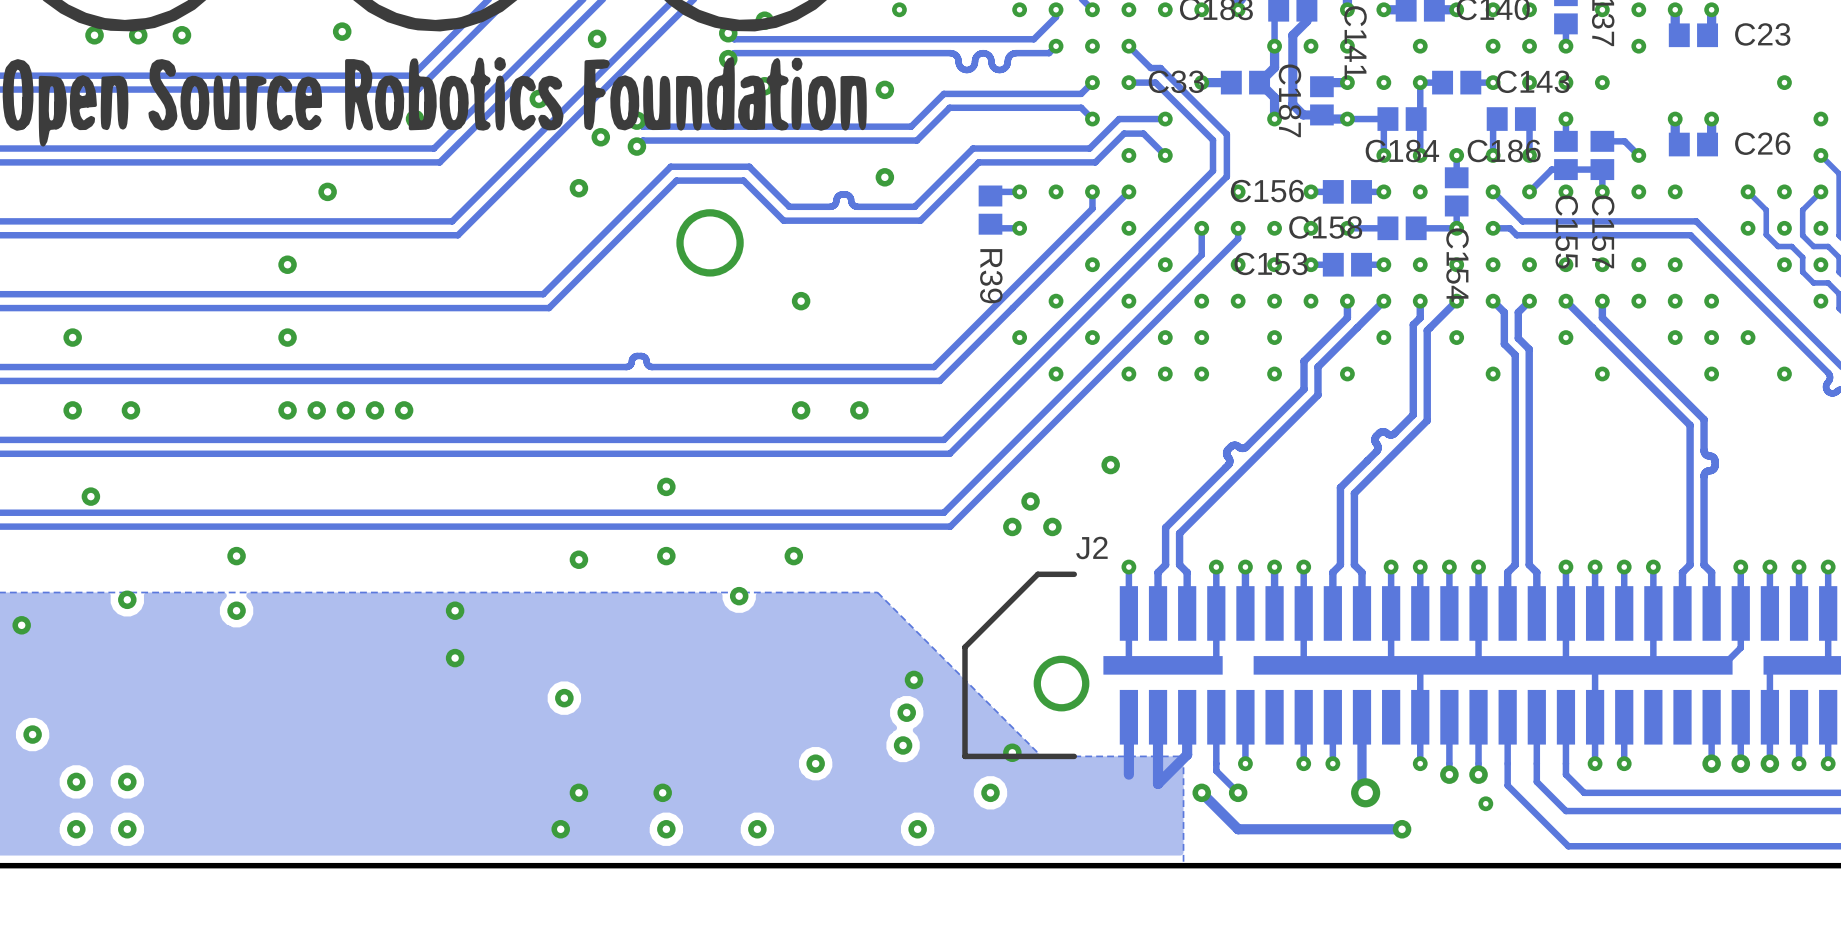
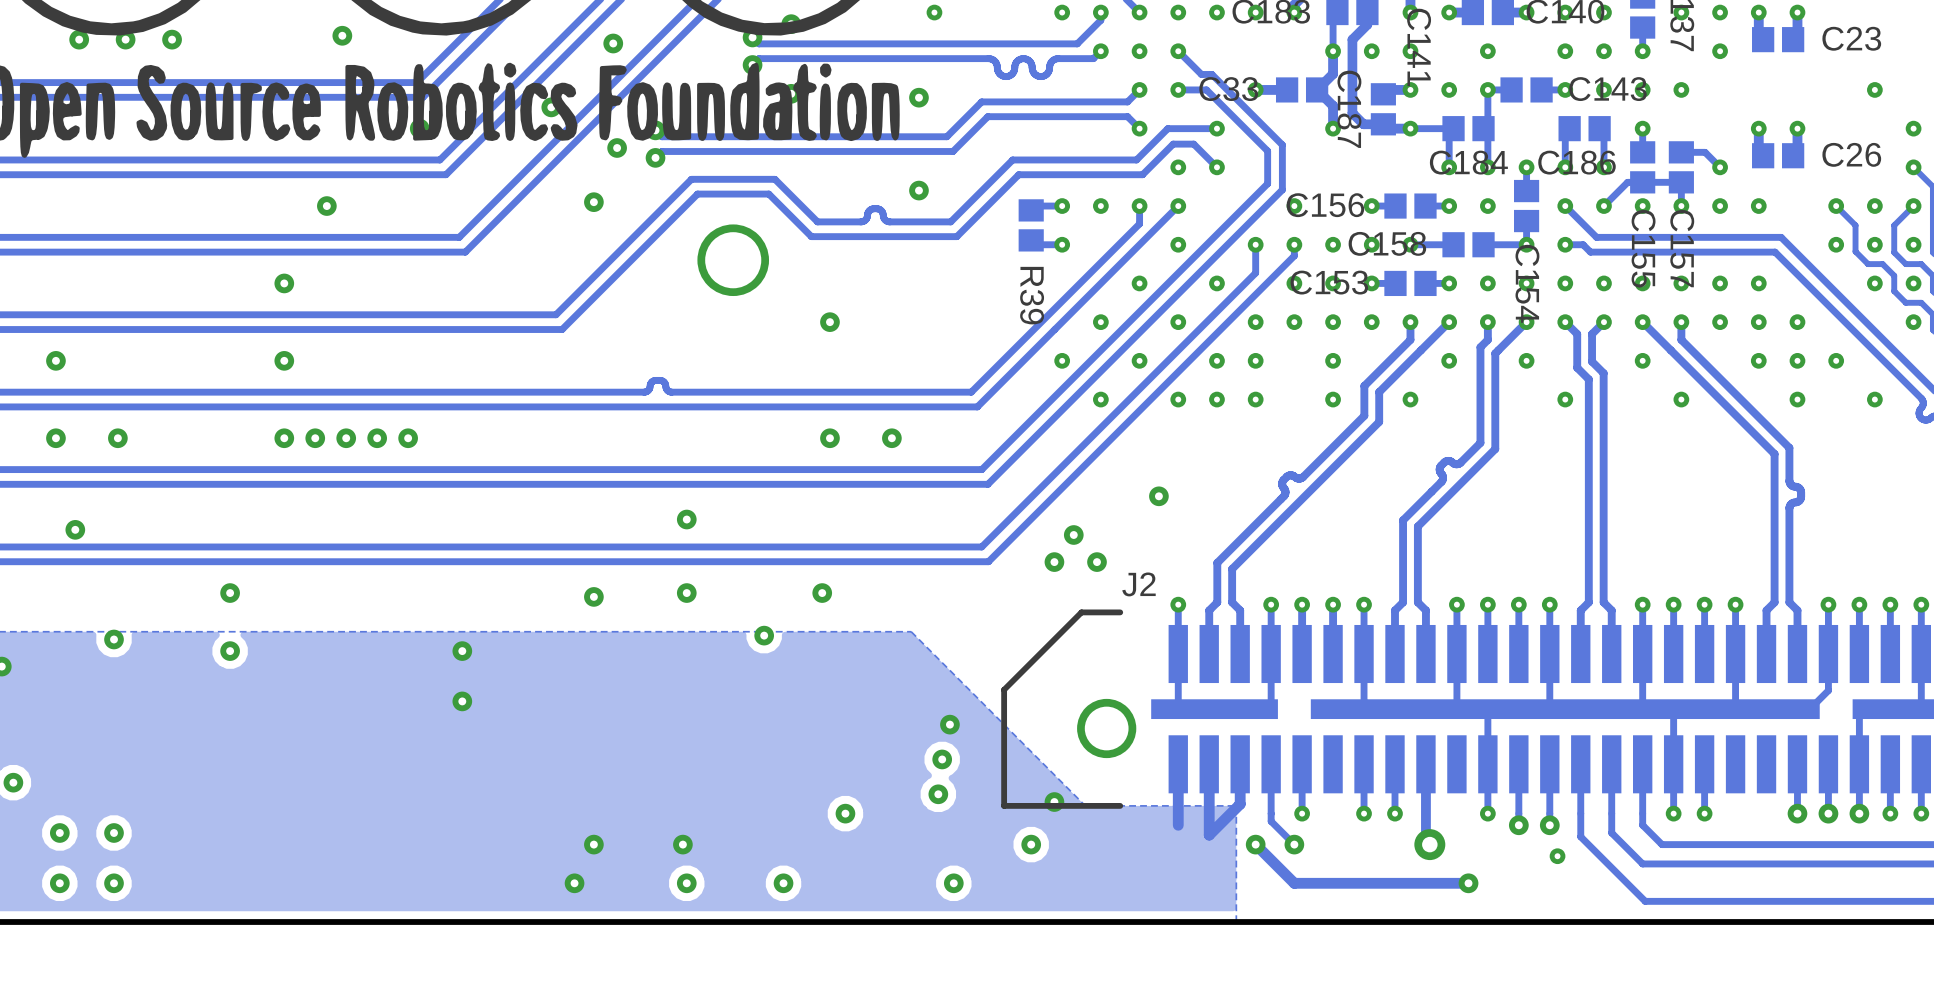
via: (564, 698) -> none

